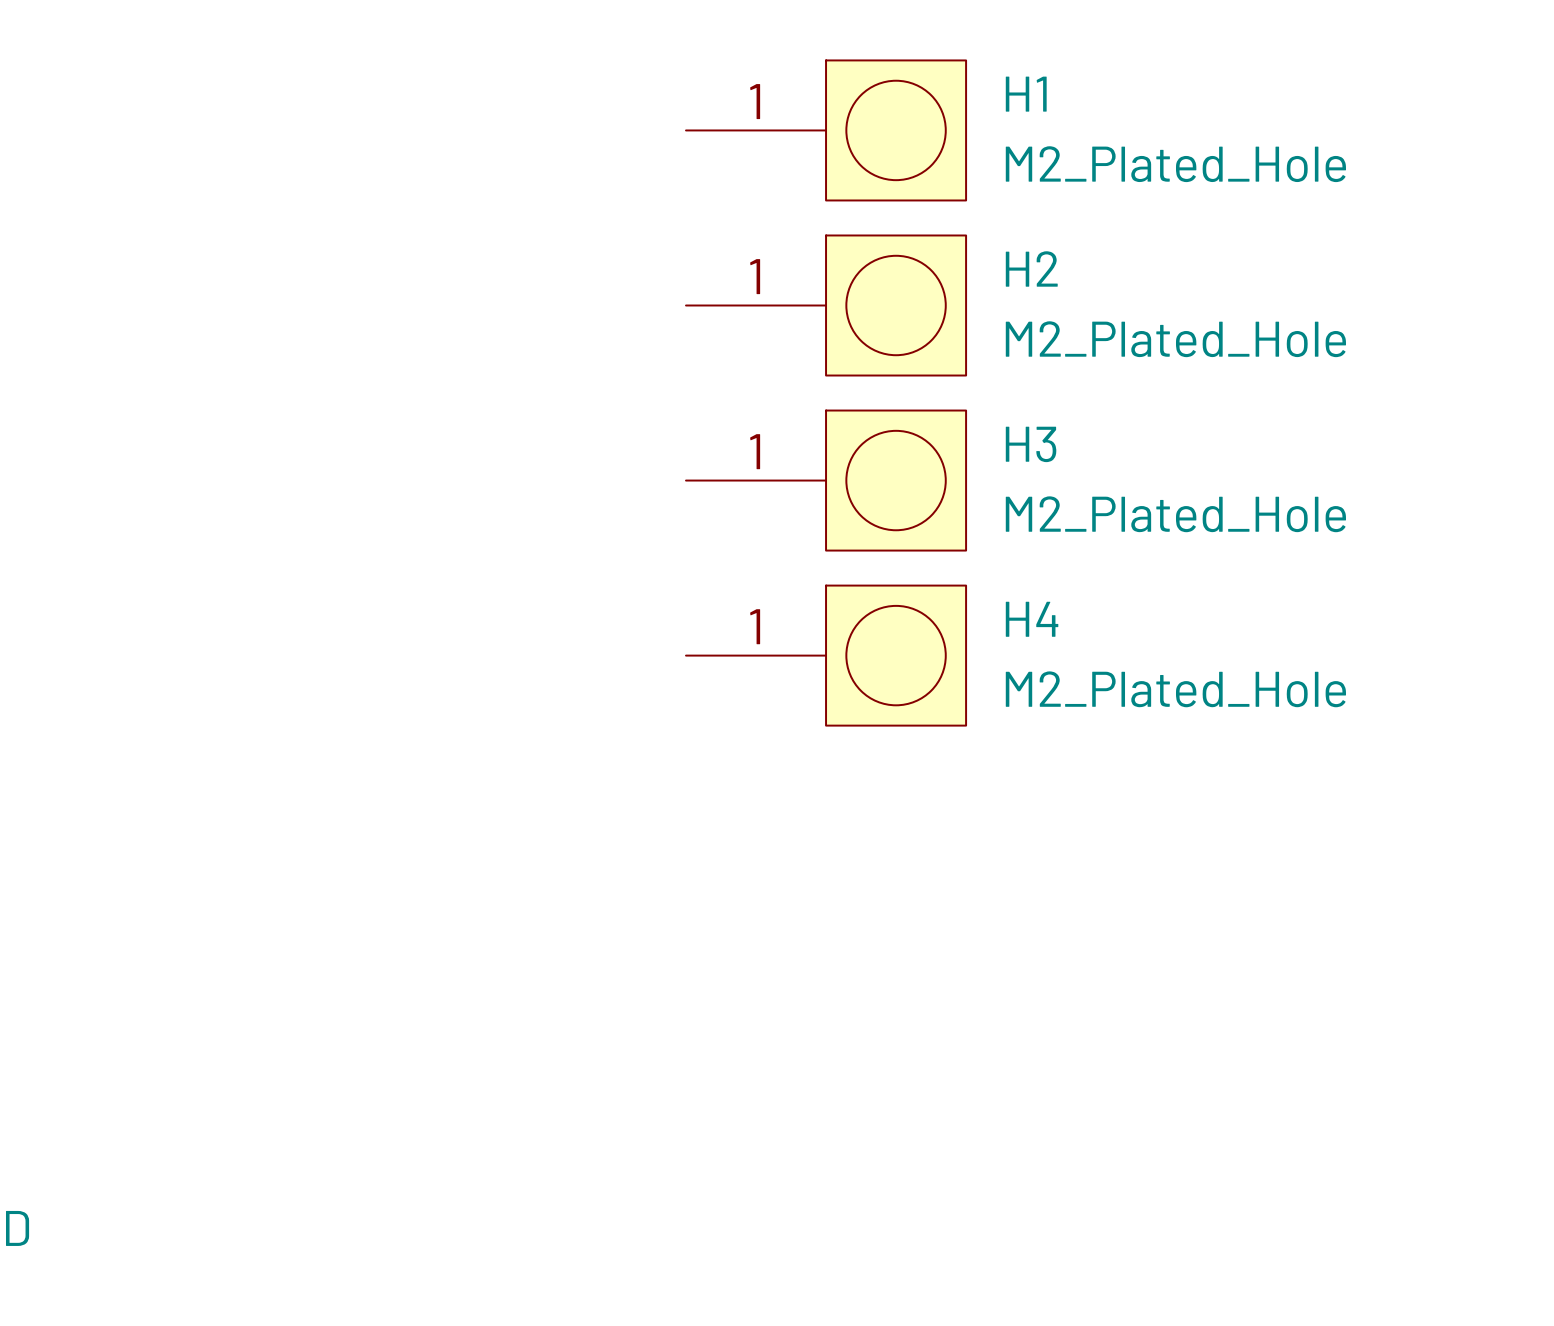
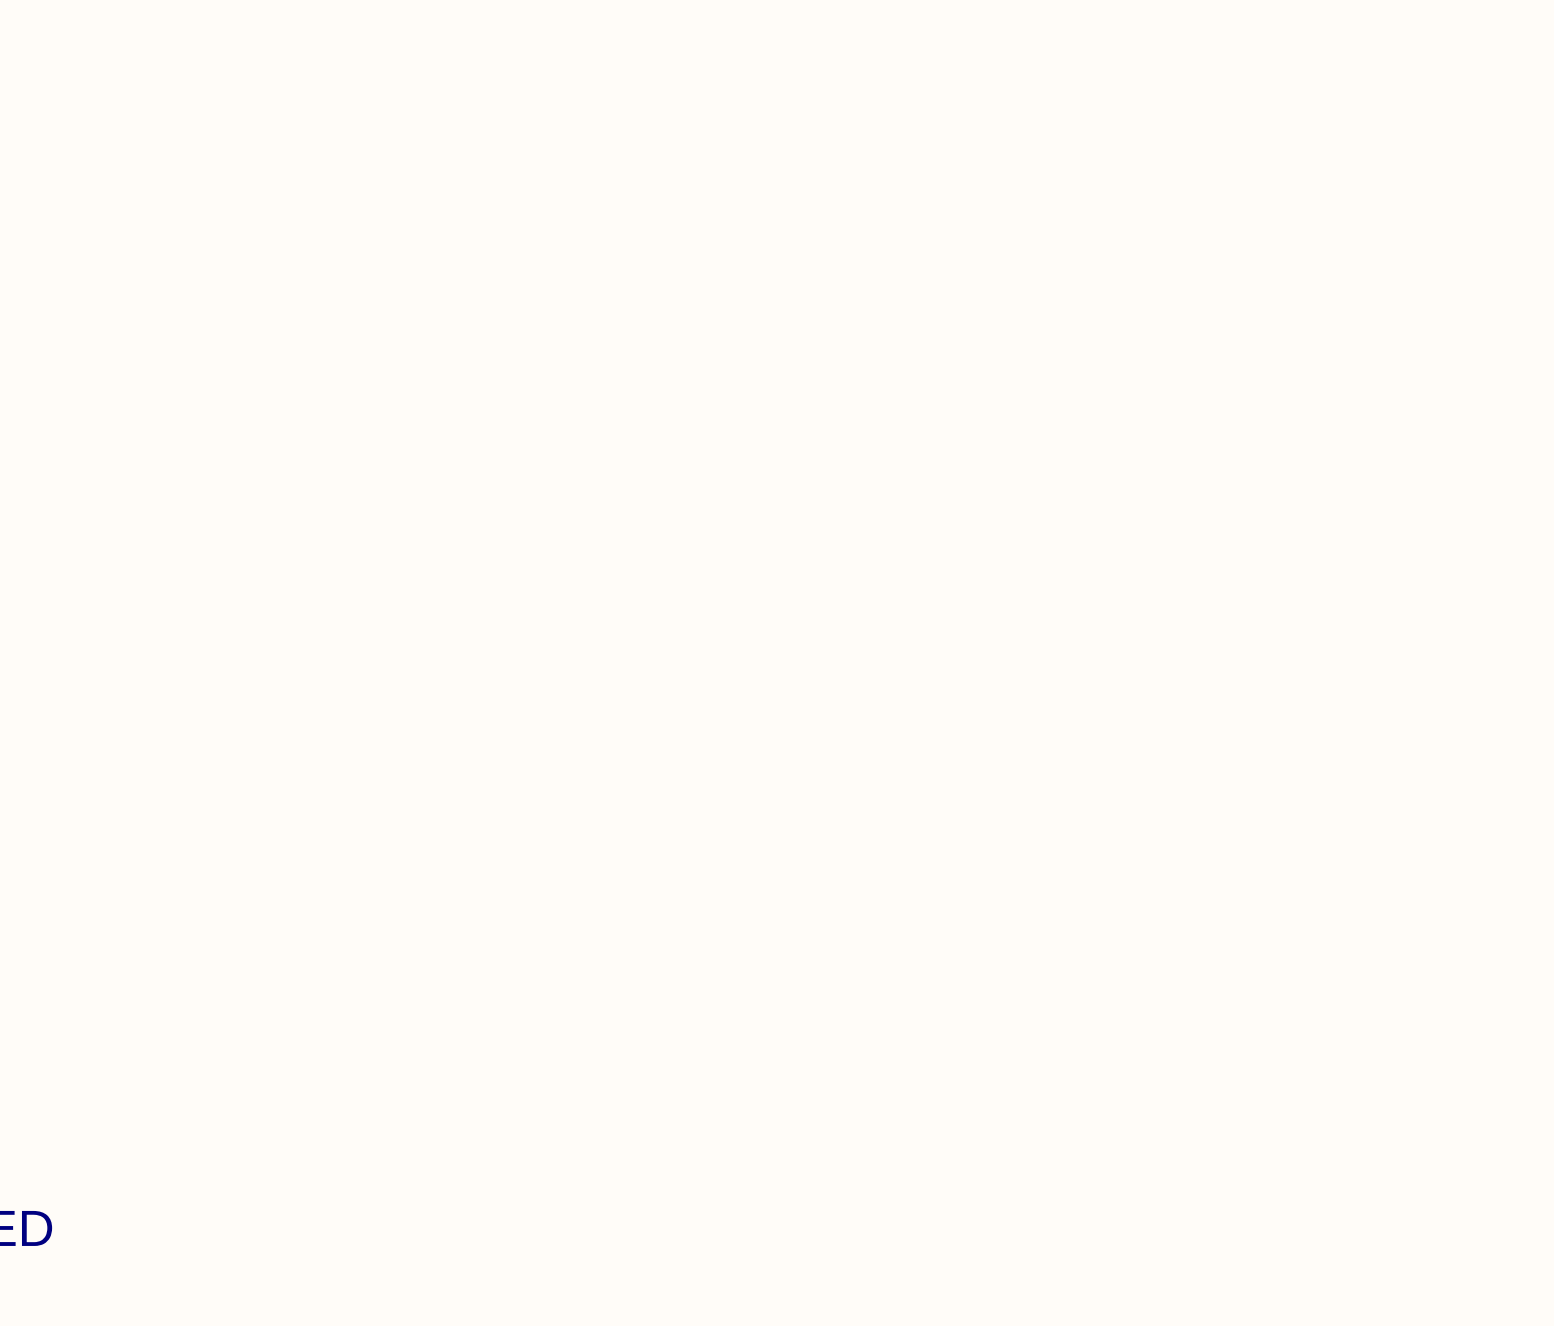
H1: M2_Plated_Hole (826, 130) -> none
H2: M2_Plated_Hole (826, 305) -> none
H3: M2_Plated_Hole (826, 480) -> none
H4: M2_Plated_Hole (826, 655) -> none

